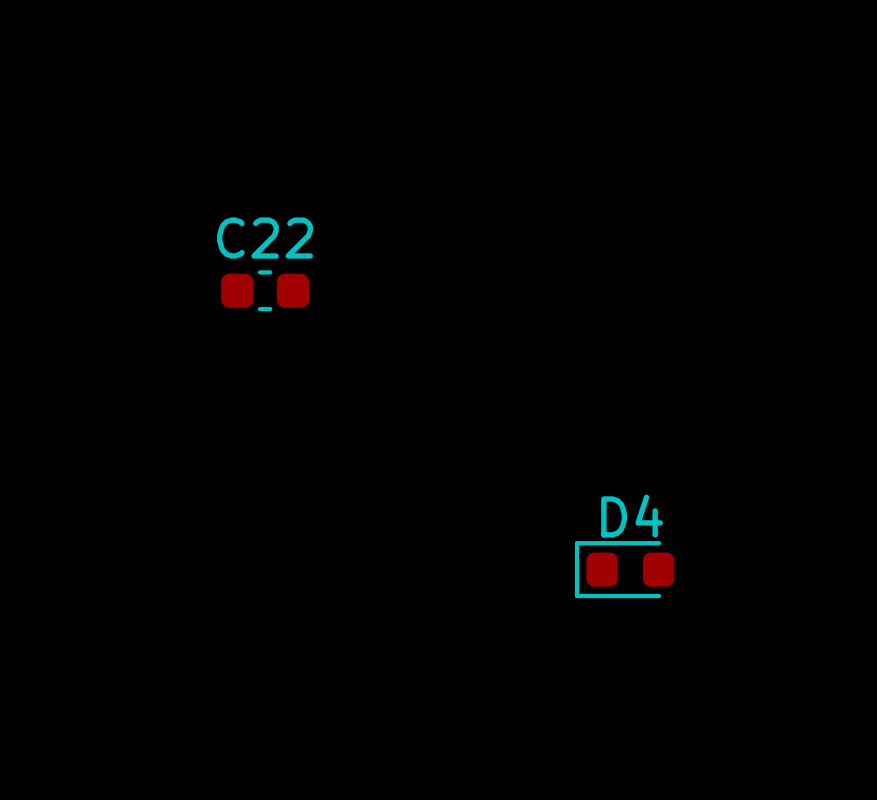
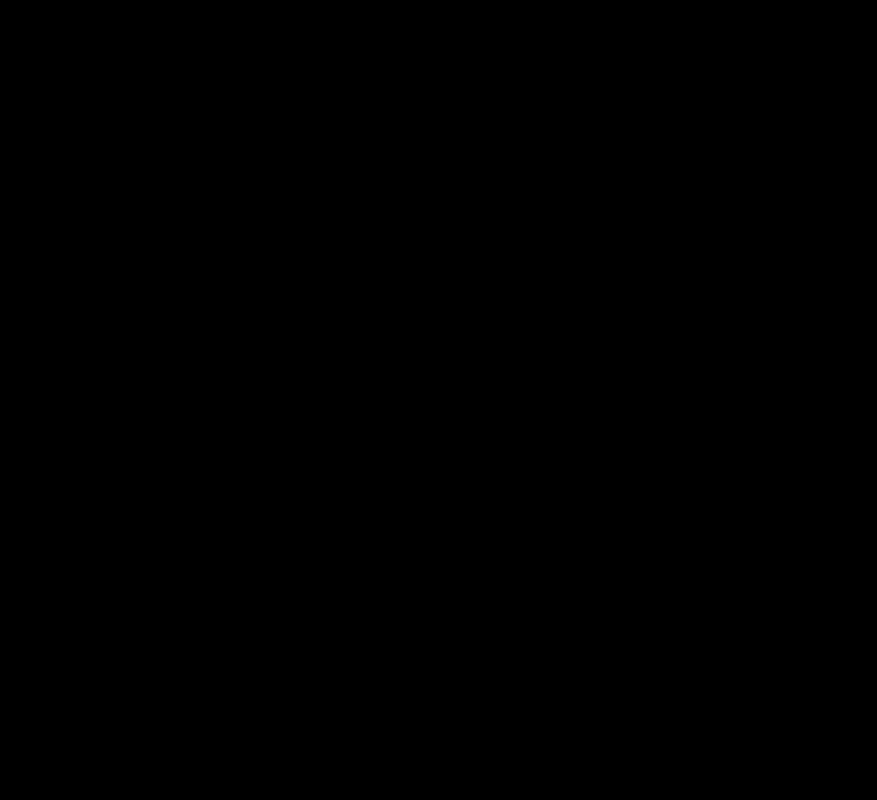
C22: (265, 290) -> none
D4: (624, 569) -> none

